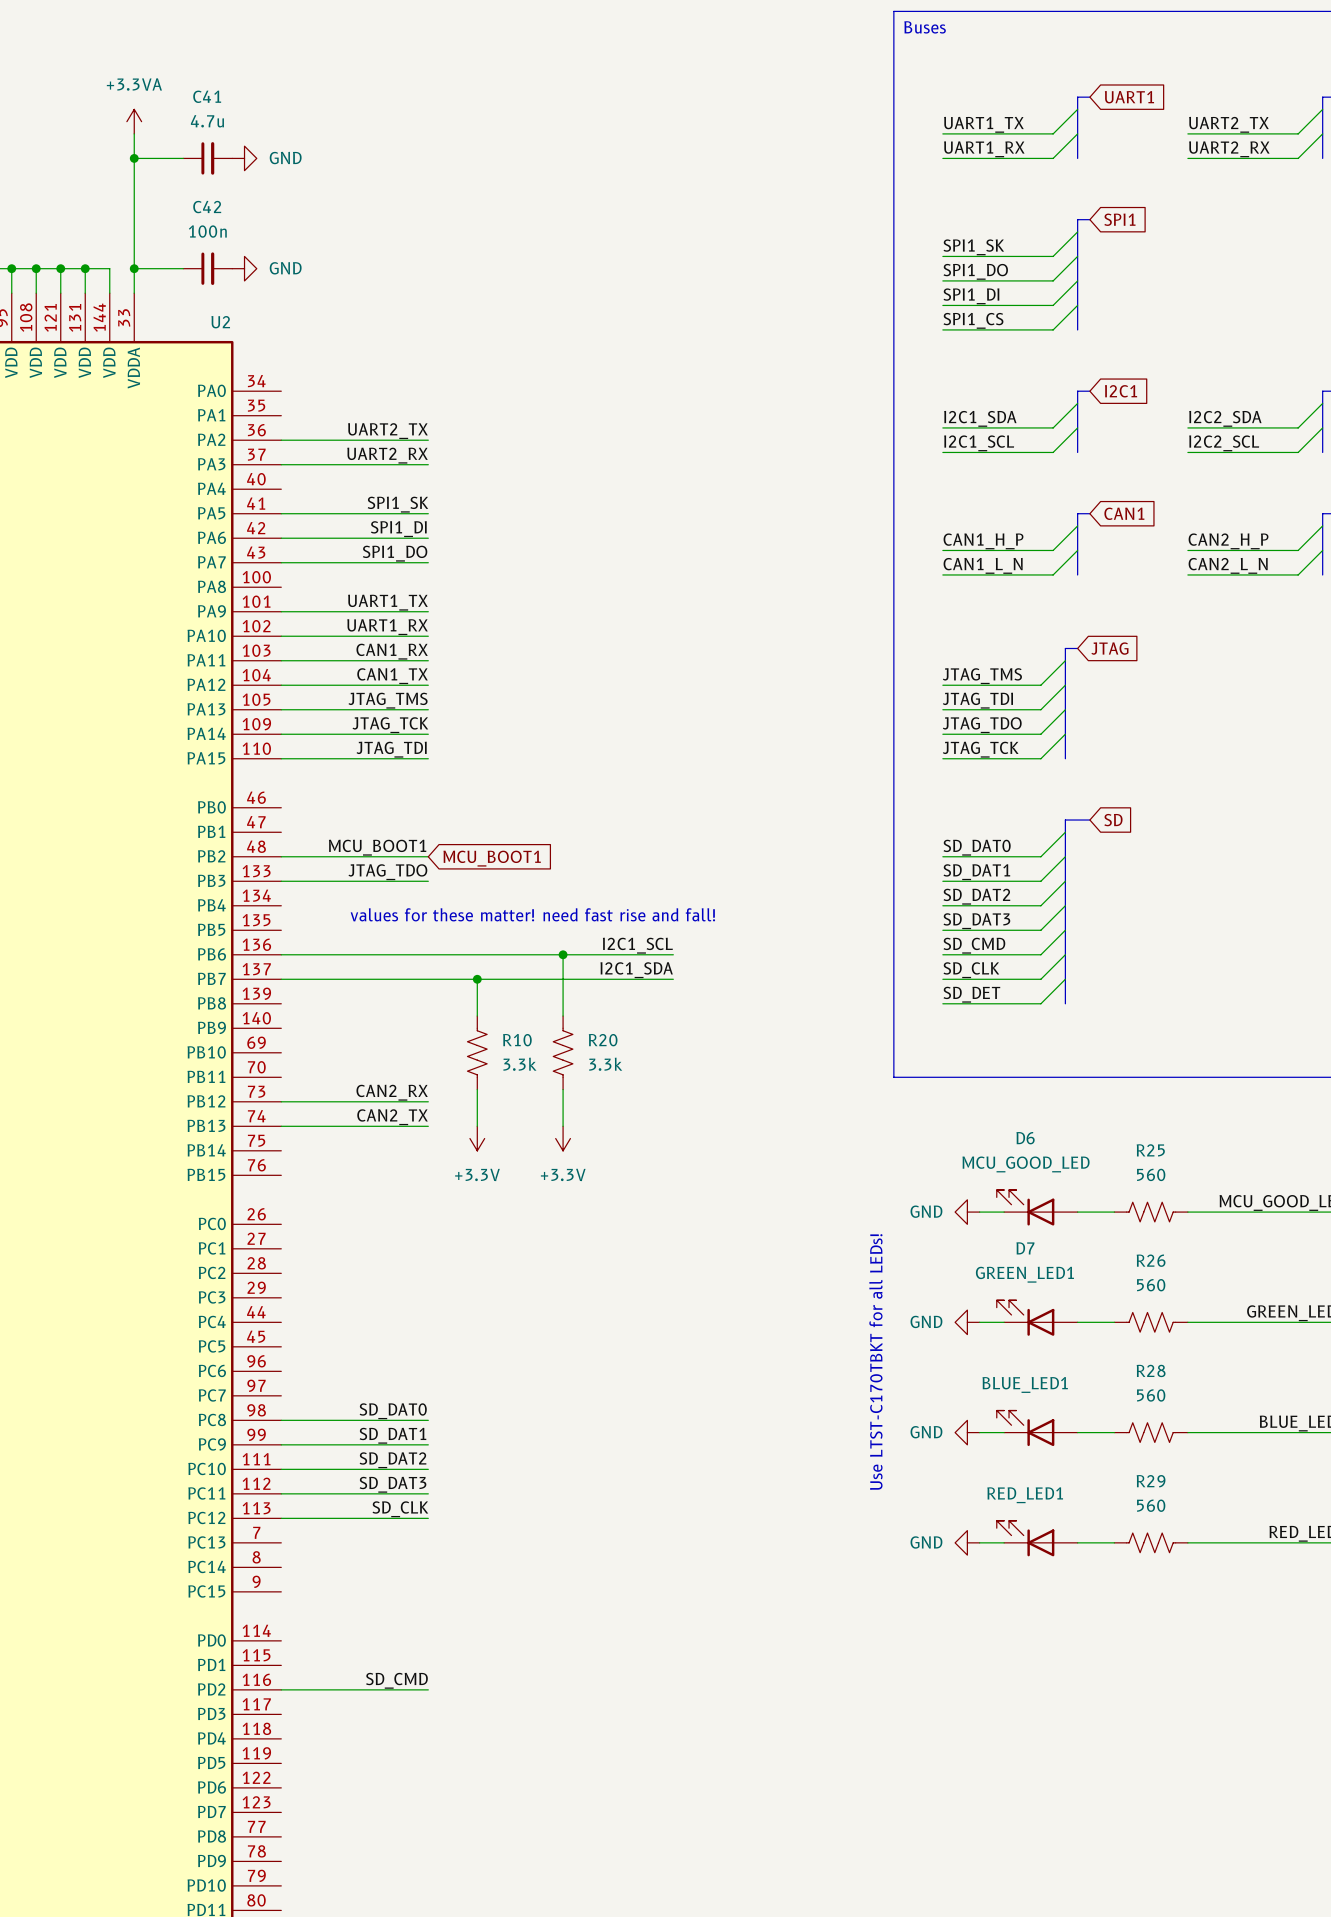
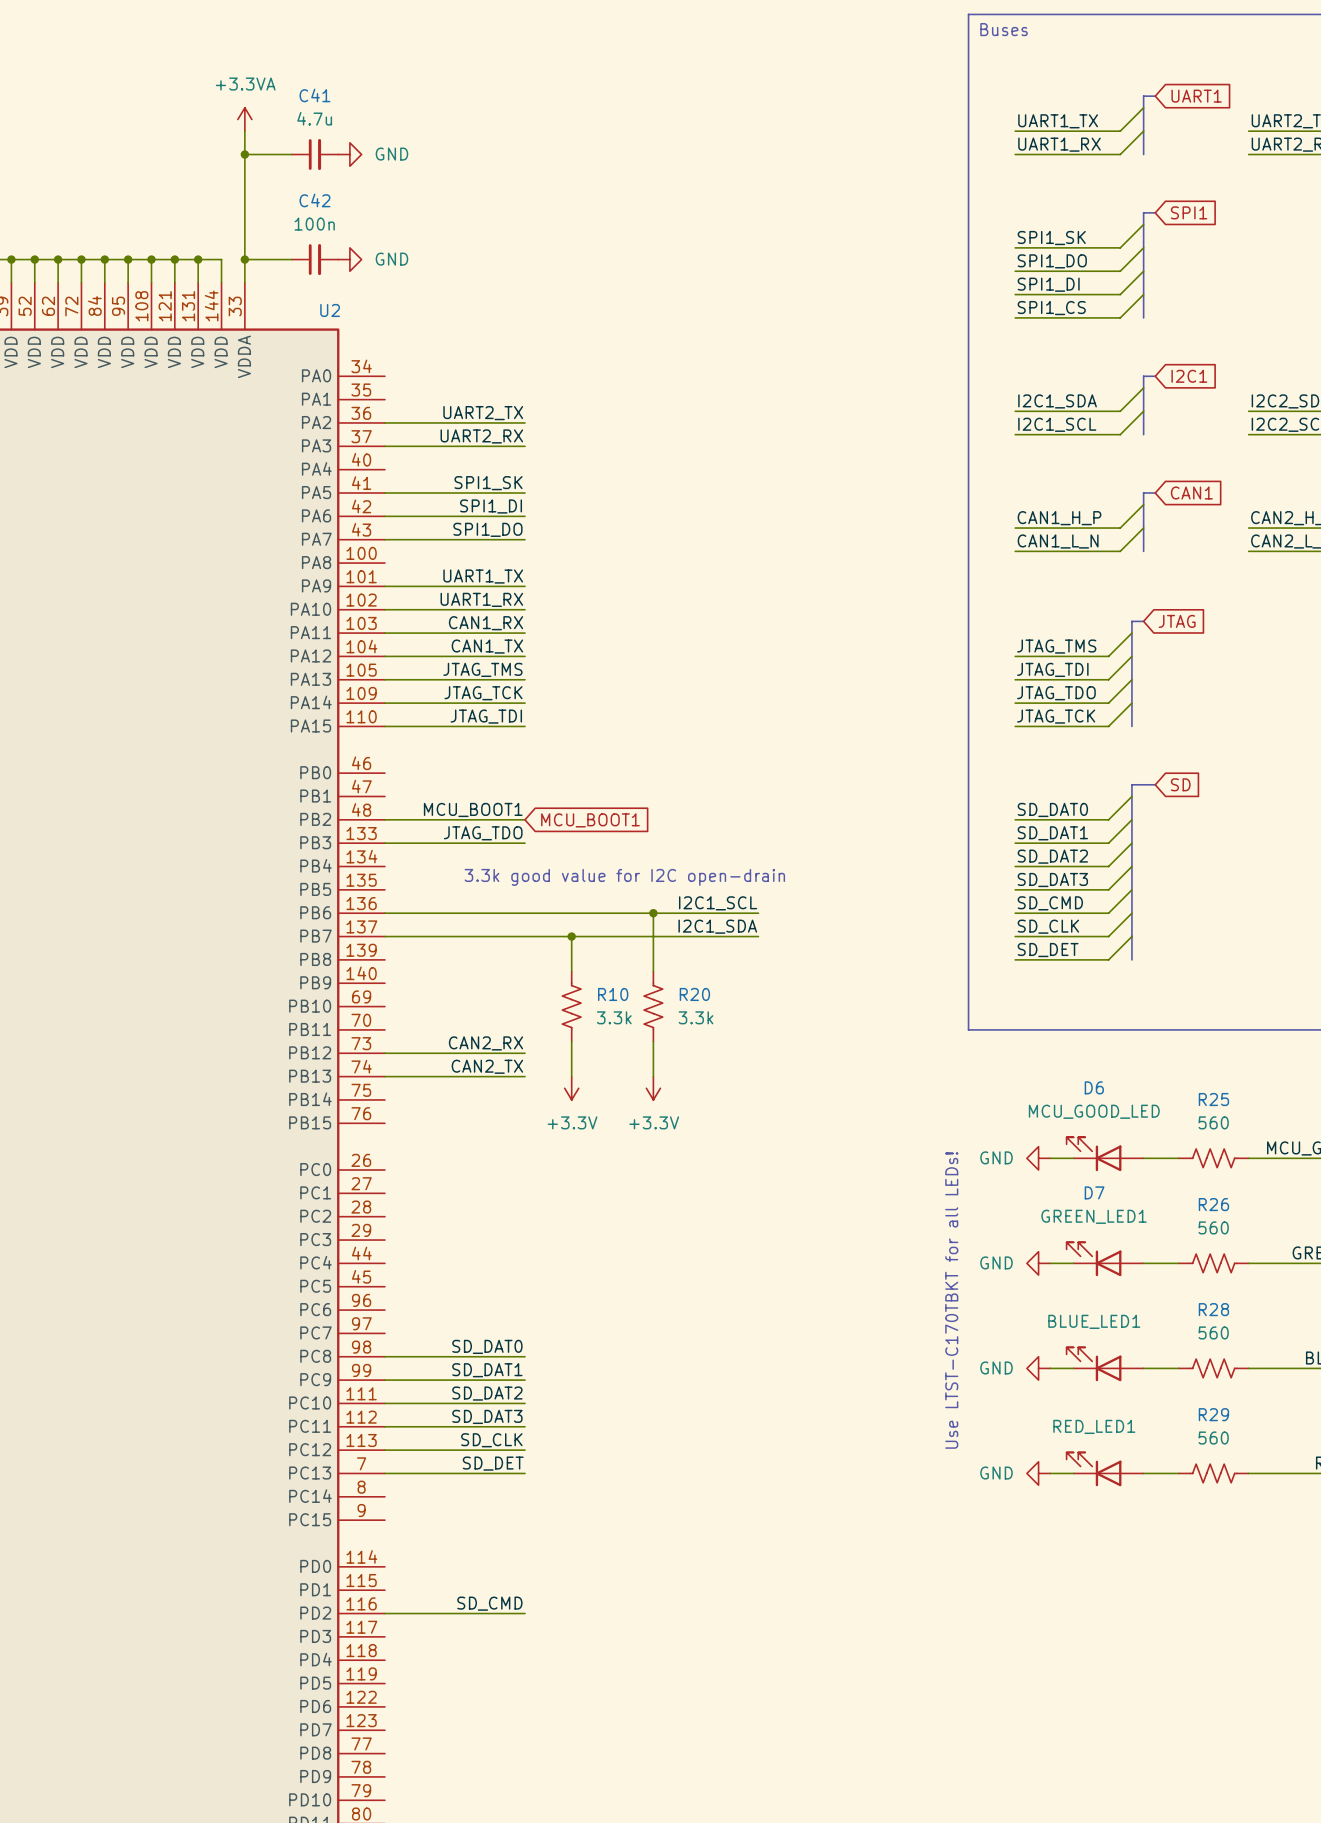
text: values for these matter! need fast rise and fall! (532, 914) -> 3.3k good value for I2C open-drain (624, 877)
label: none -> SD_DET (493, 1463)
wire: none -> (384, 1473) (525, 1473)

